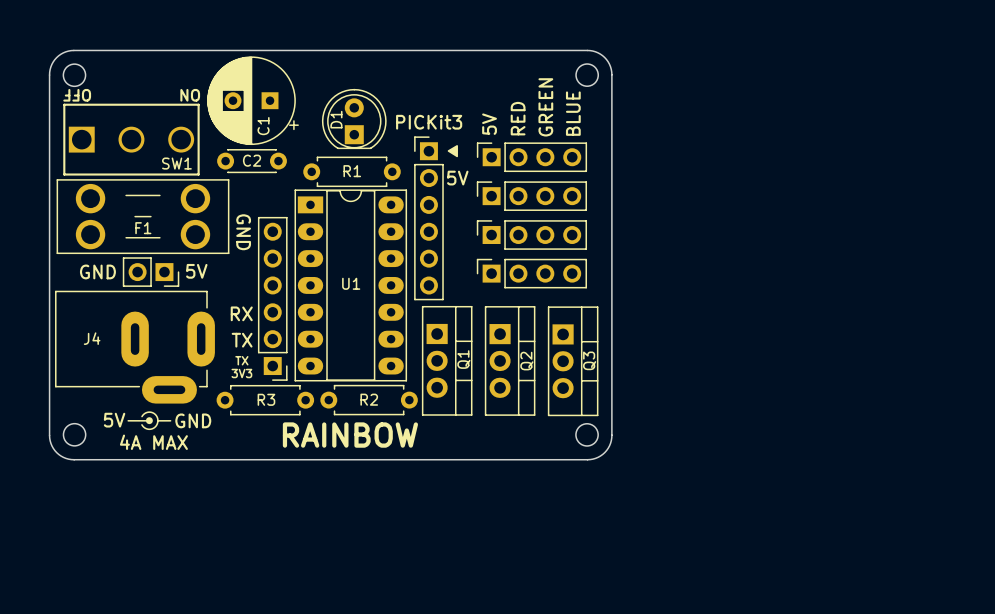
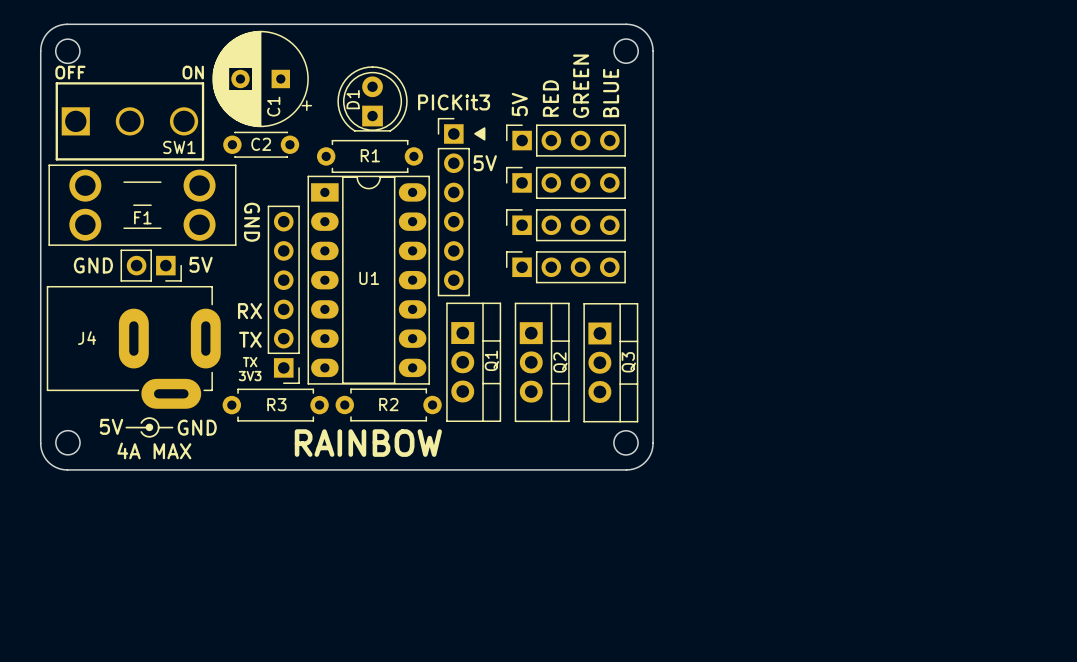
text rotation: 0° (77, 95) -> 180° (70, 72)
text rotation: 0° (190, 95) -> 180° (193, 72)

